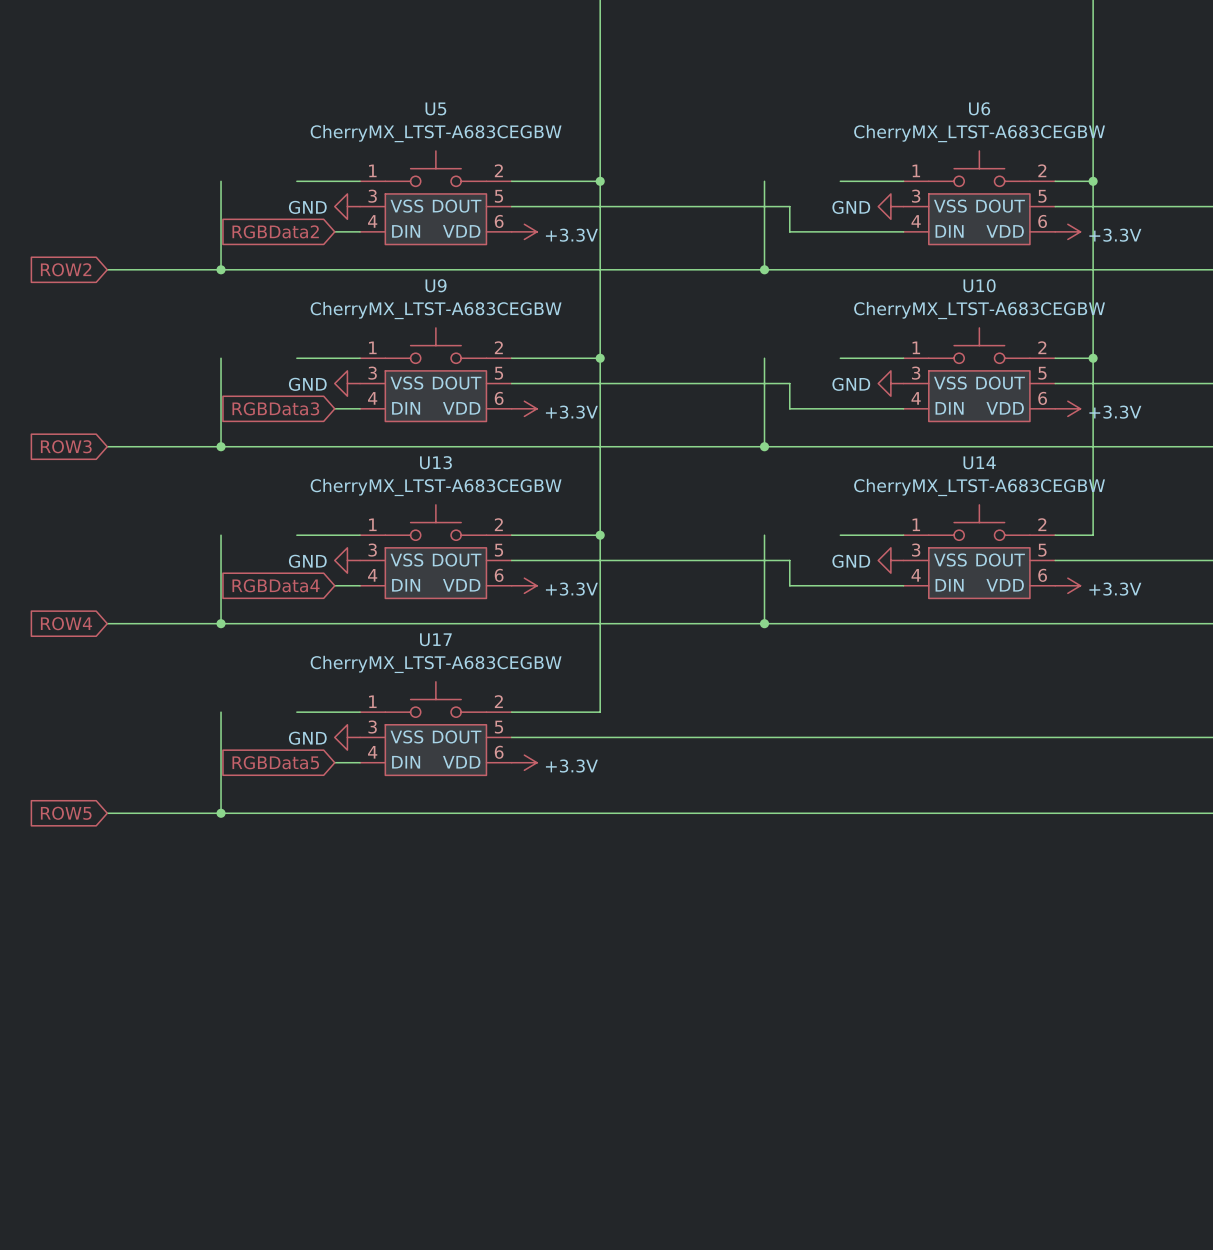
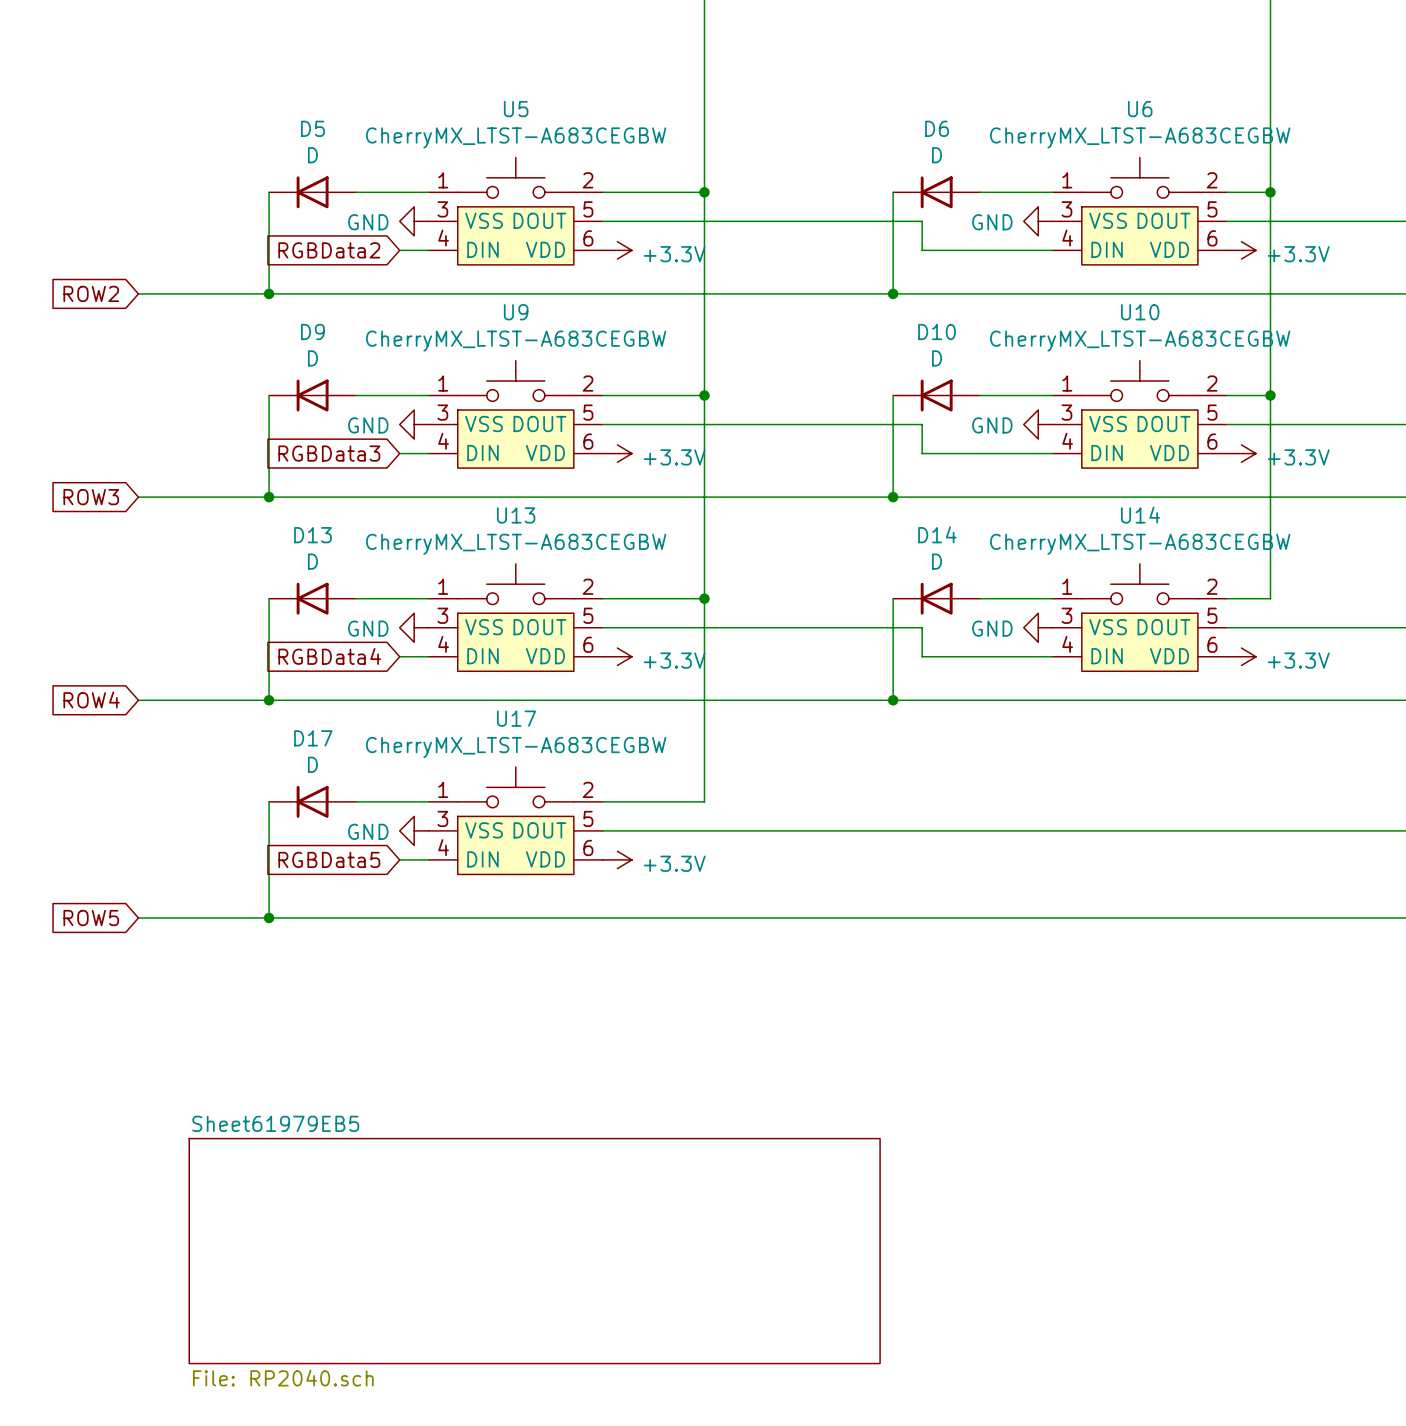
D5: none -> D (312, 192)
D6: none -> D (936, 192)
D9: none -> D (312, 395)
D10: none -> D (936, 395)
D13: none -> D (312, 598)
D14: none -> D (936, 598)
D17: none -> D (312, 801)
sheet Sheet61979EB5: none -> File: RP2040.sch (534, 1251)

